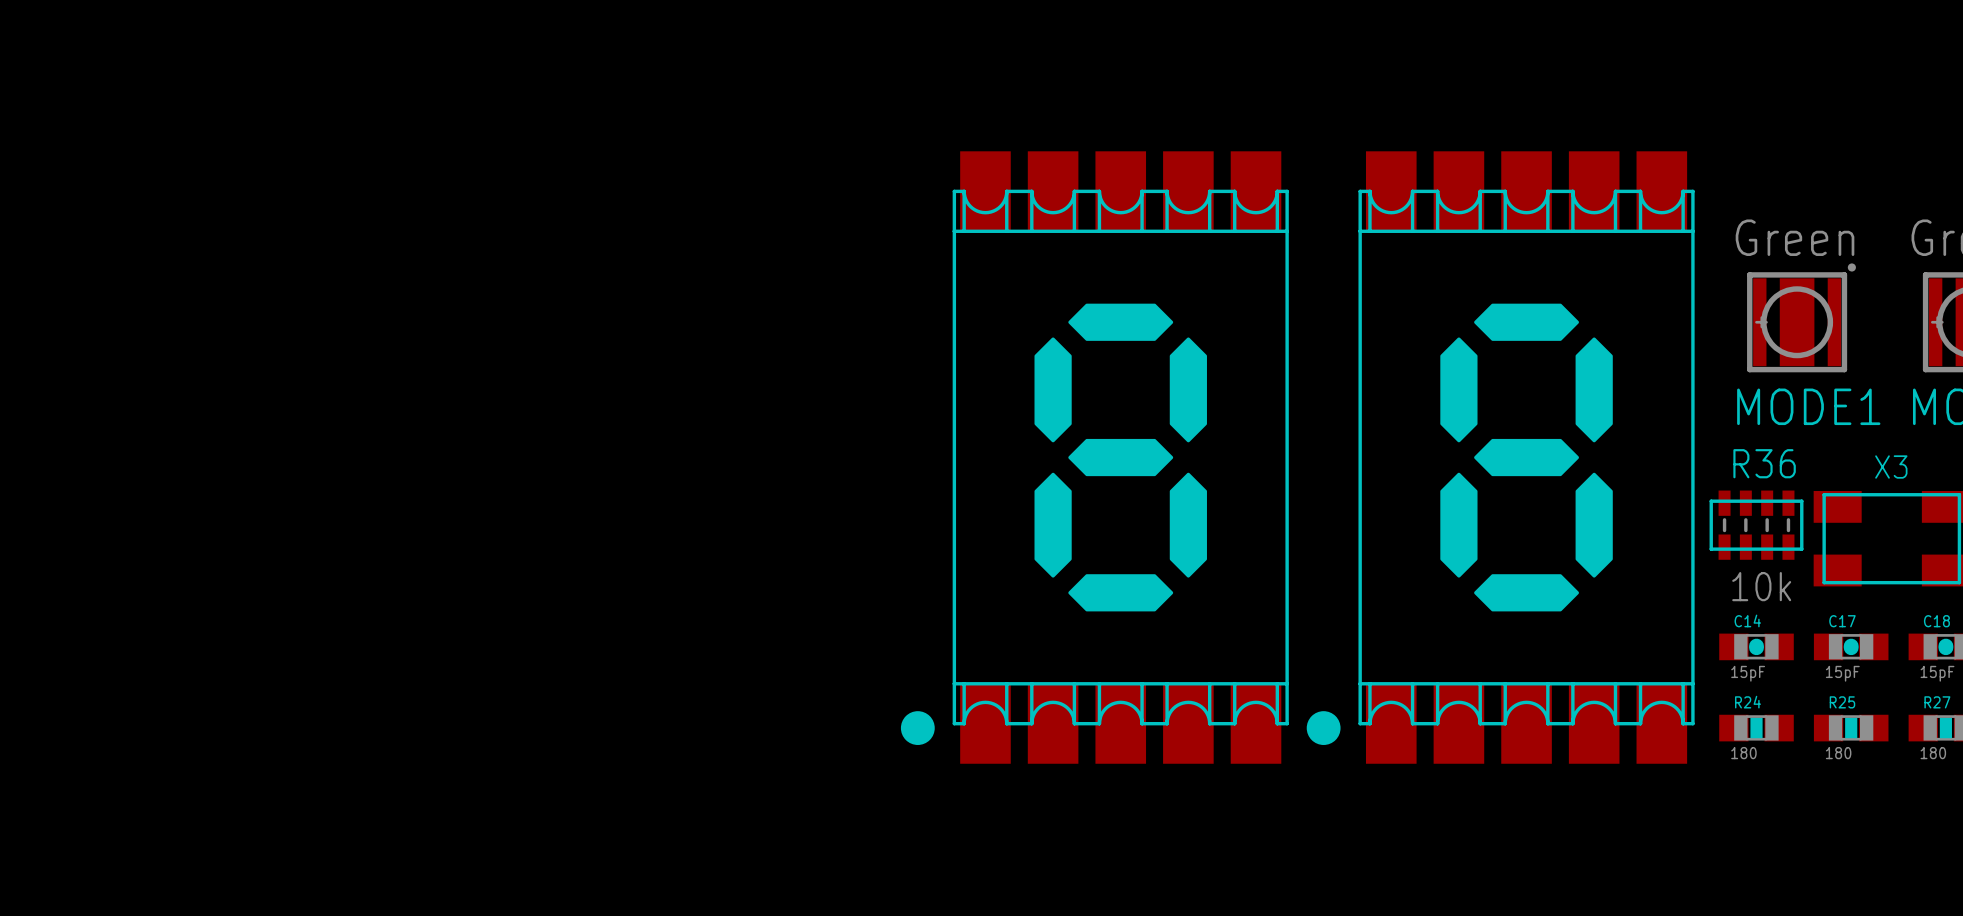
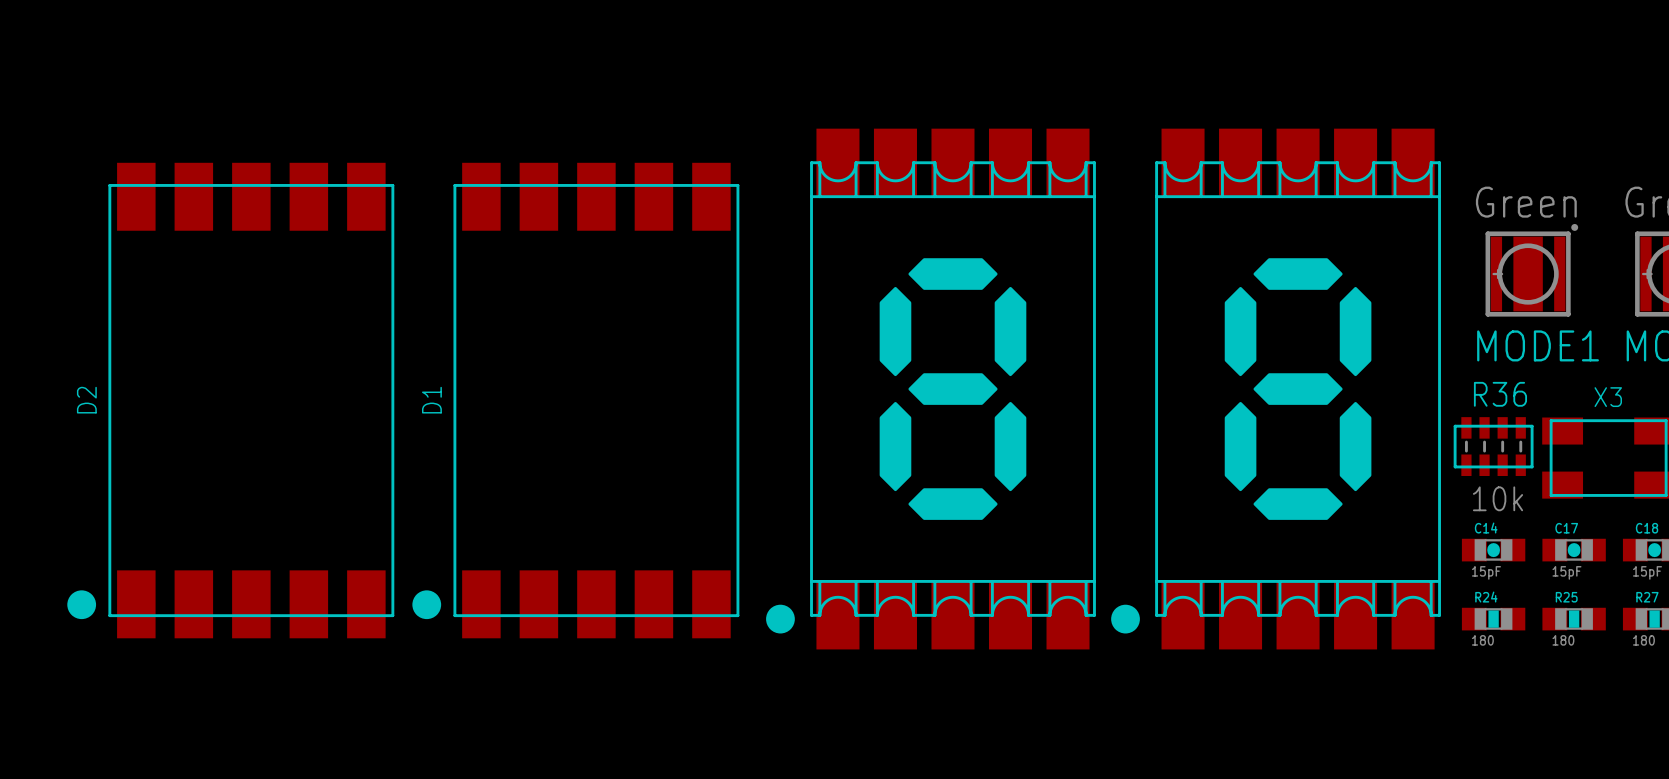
D2: none -> (230, 400)
D1: none -> (575, 400)

